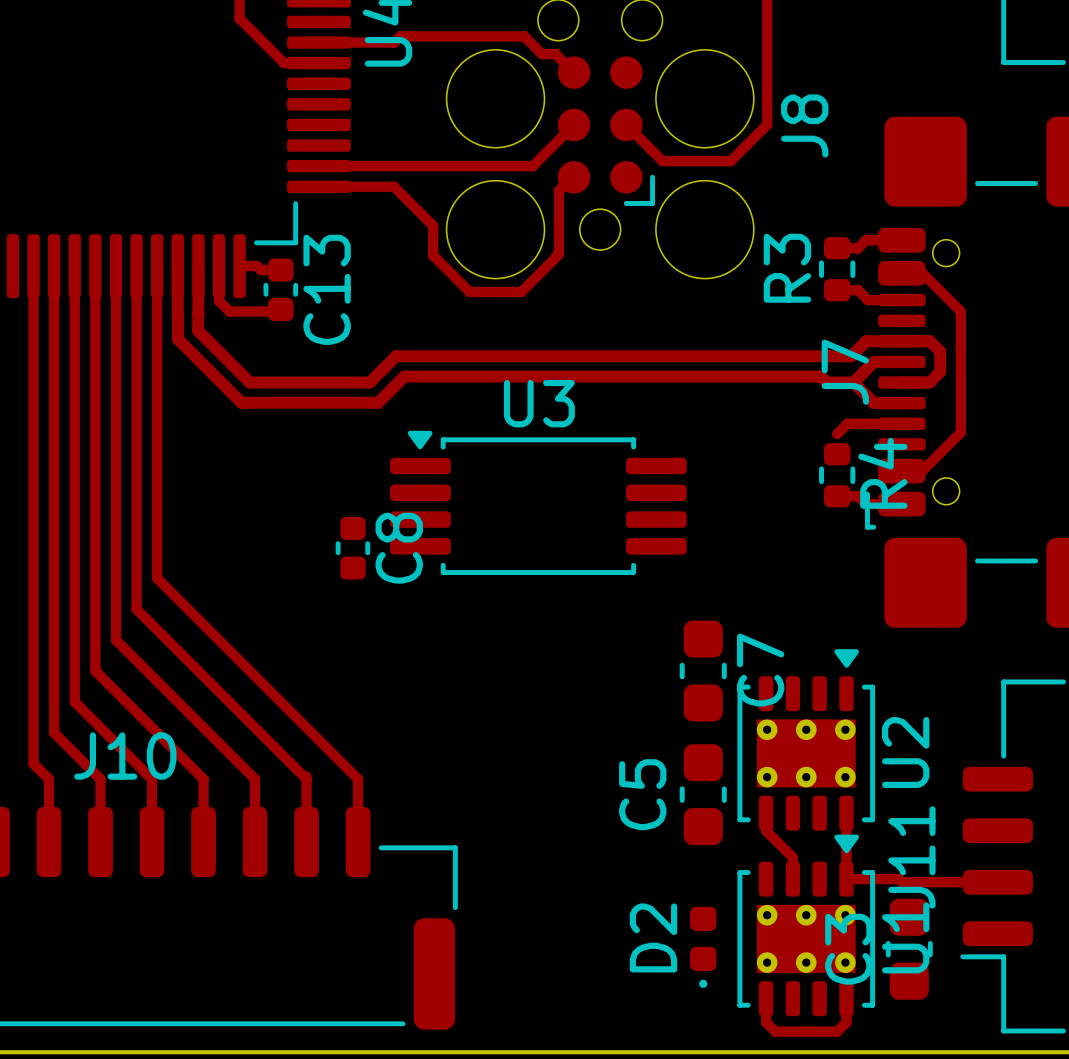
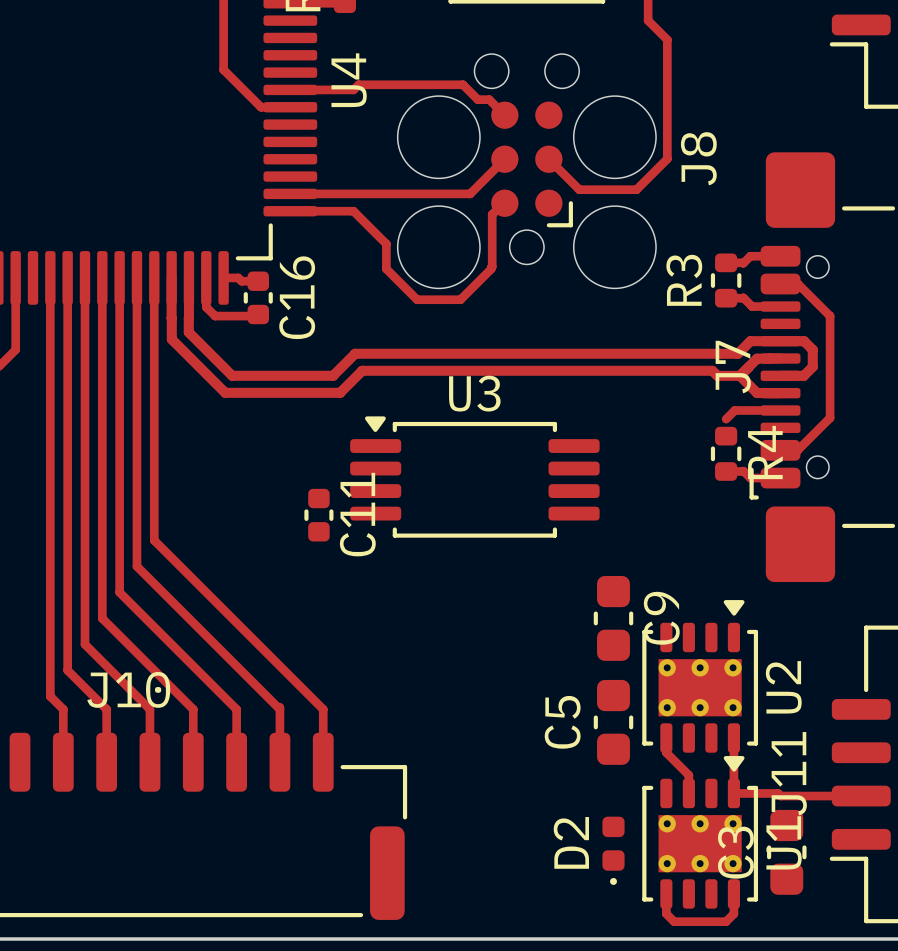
C13 name: C13 (327, 289) -> C16 (297, 297)
C8 name: C8 (399, 548) -> C11 (357, 514)
C7 name: C7 (760, 670) -> C9 (661, 618)

